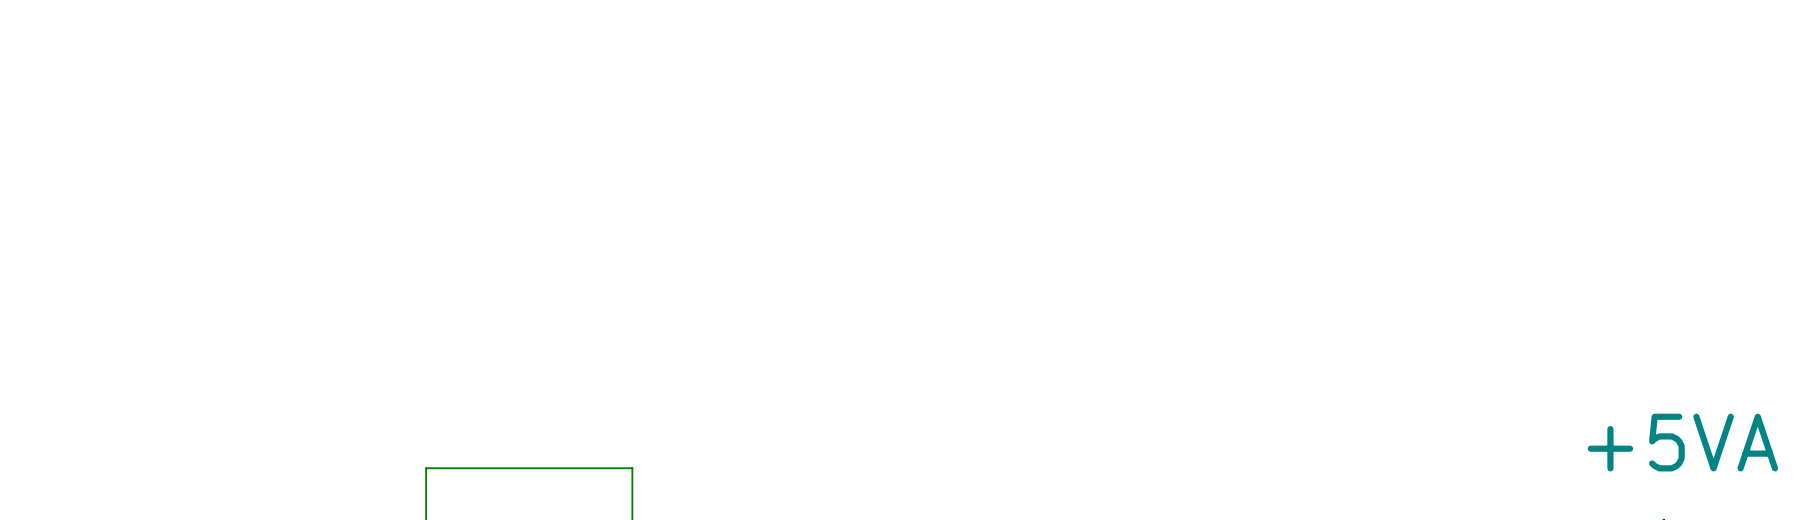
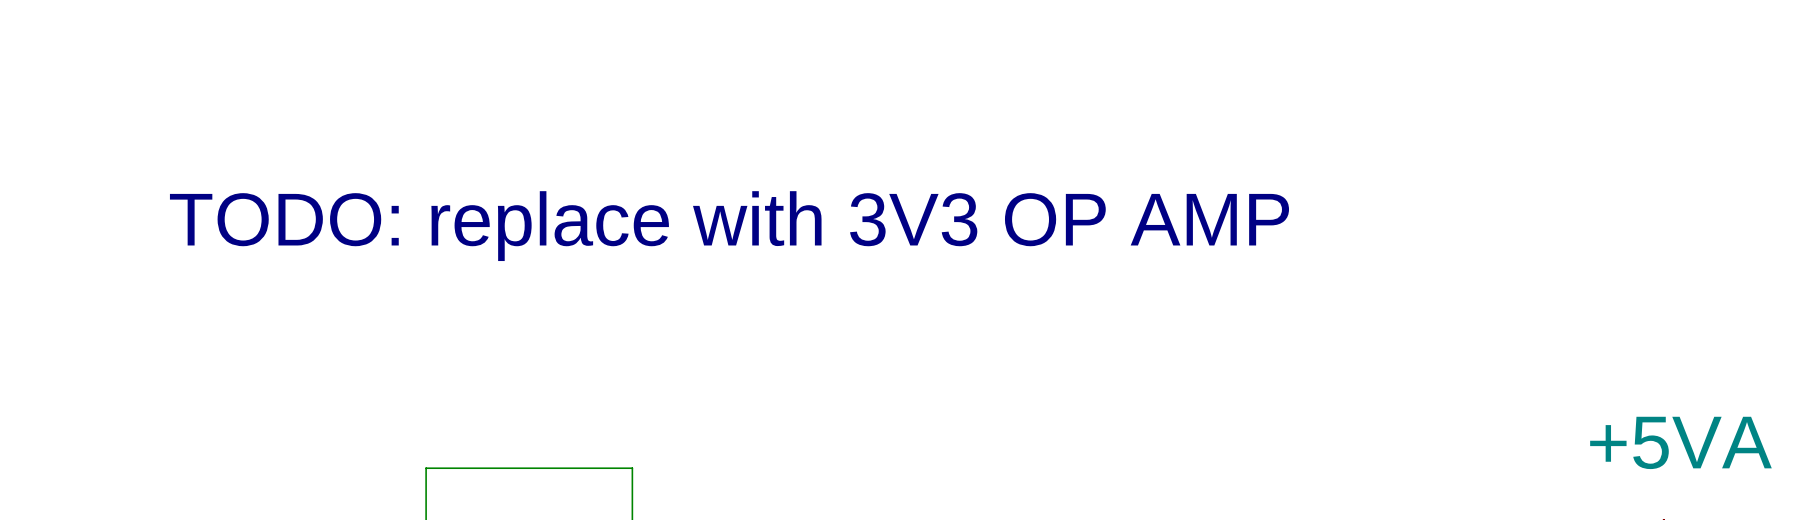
text: none -> TODO: replace with 3V3 OP AMP (729, 226)

